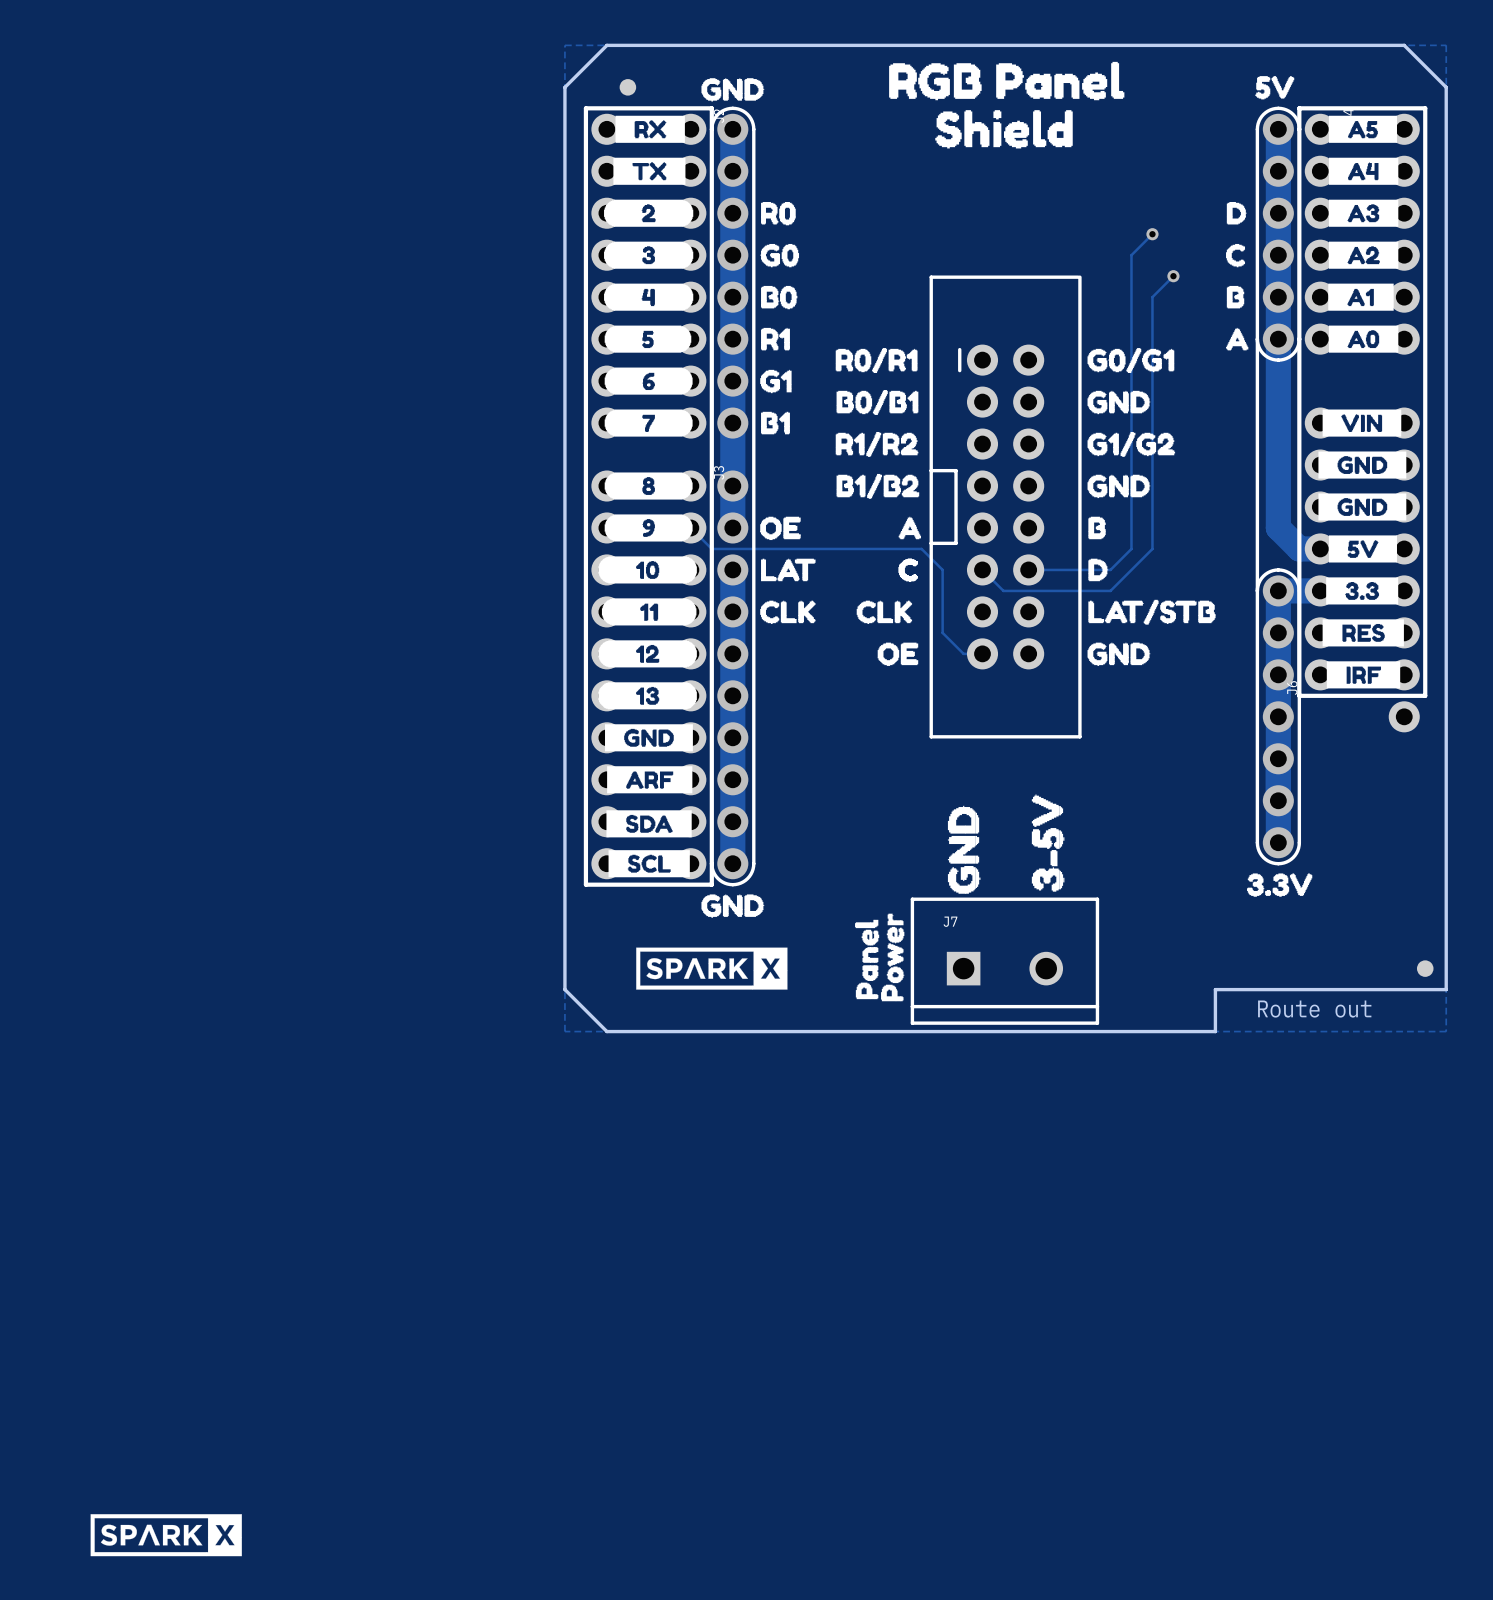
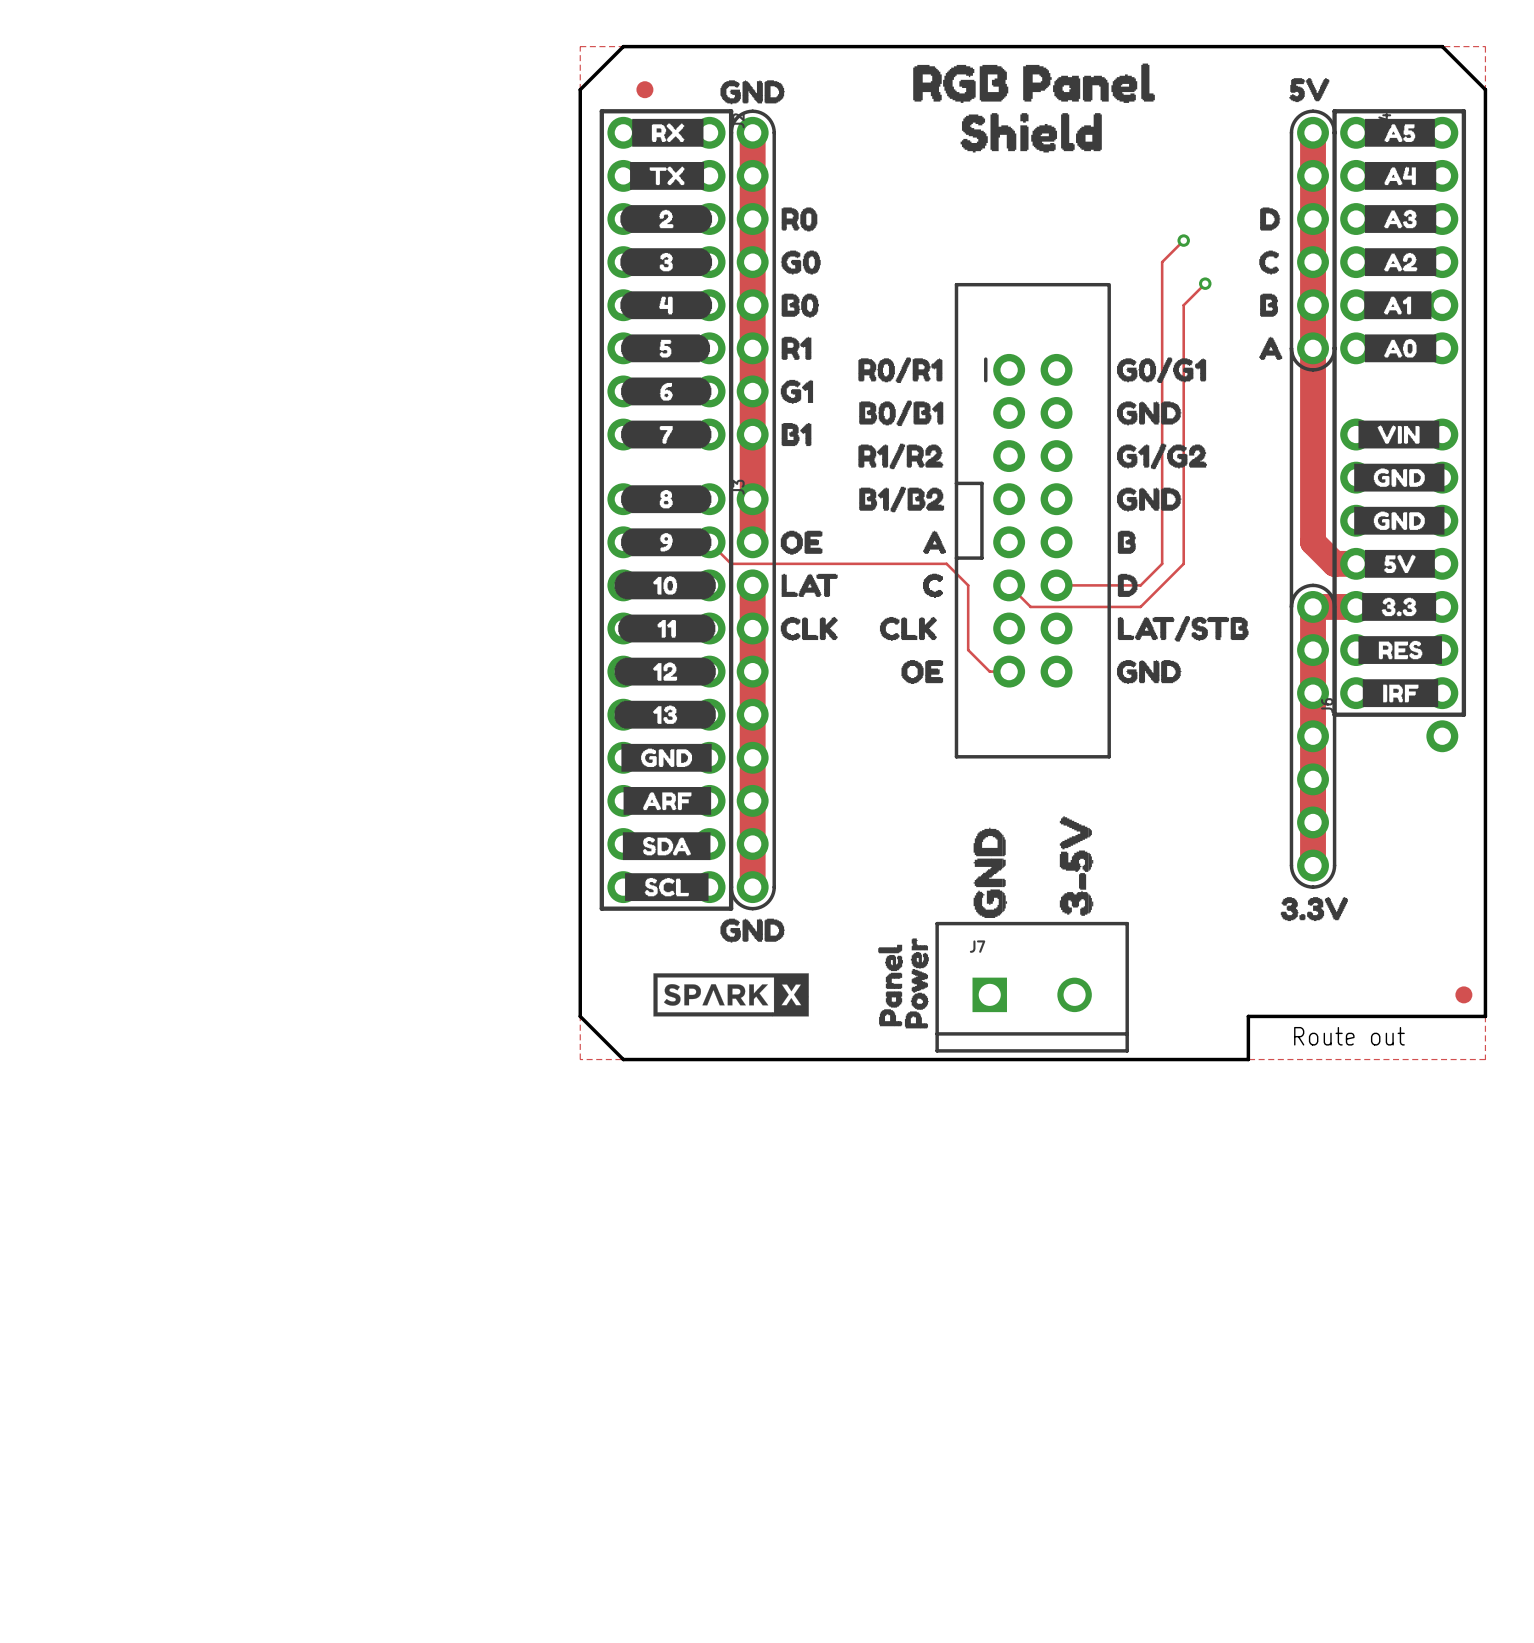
drawing: [90, 1514, 242, 1557] -> none

